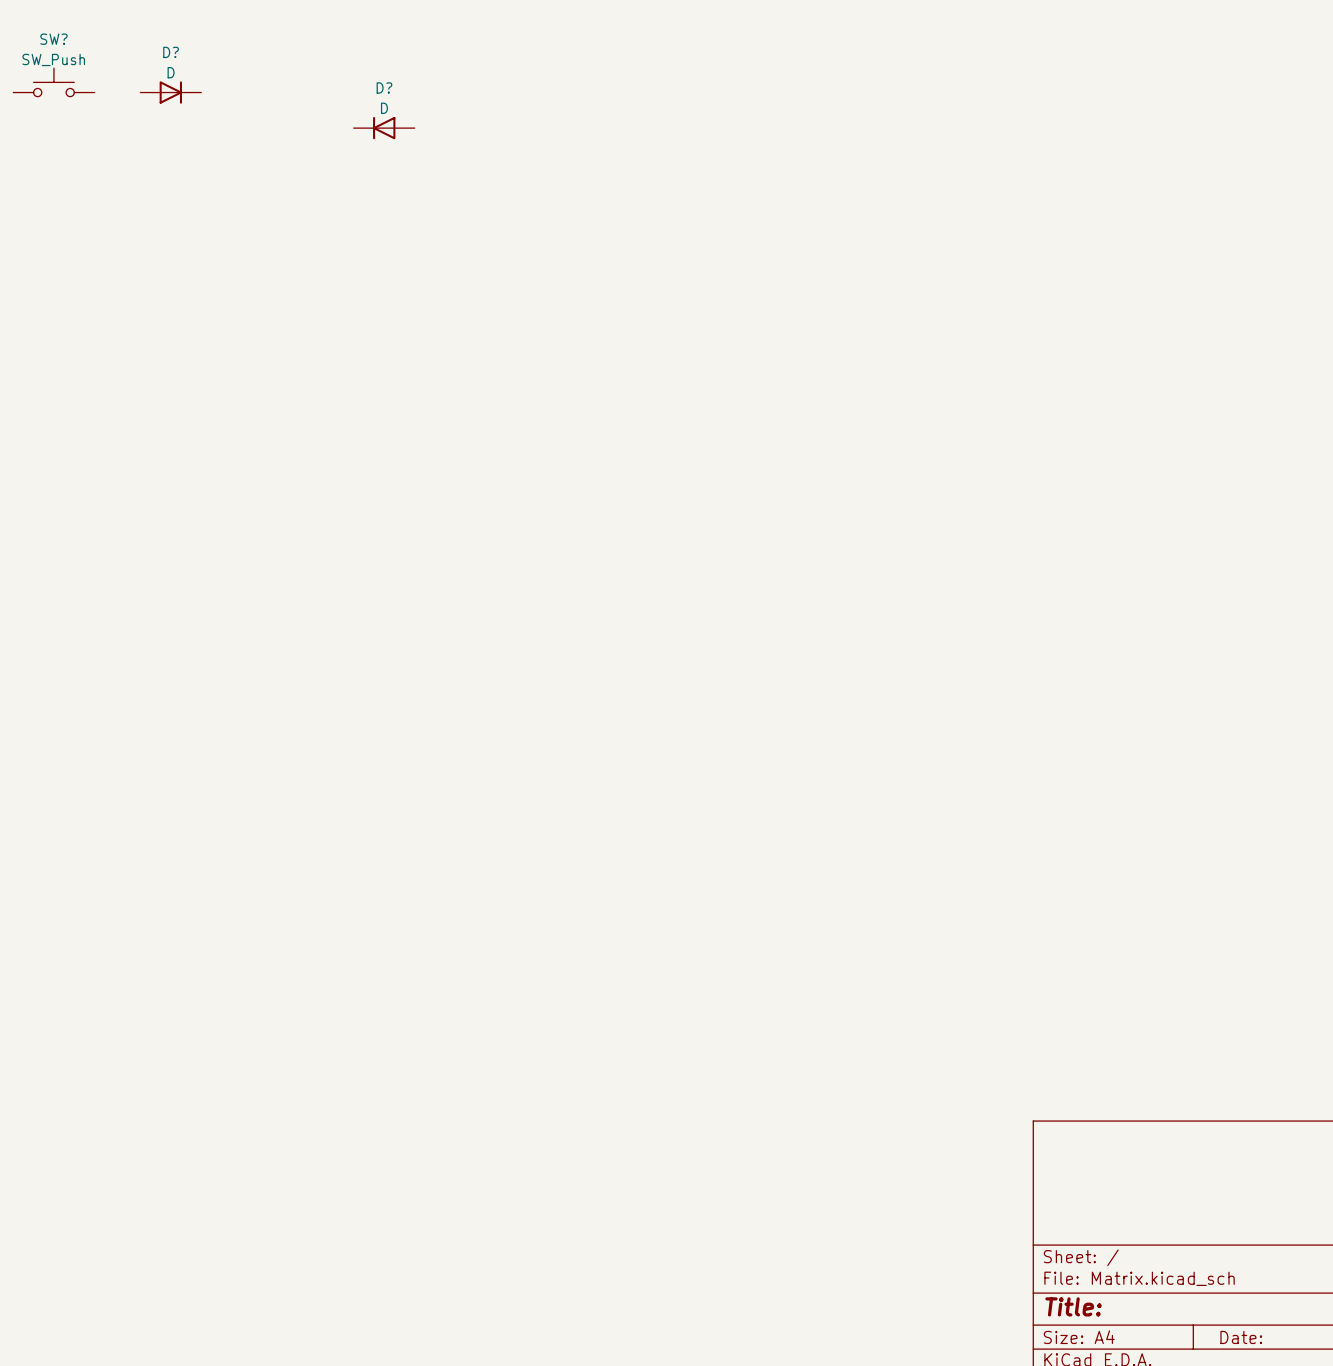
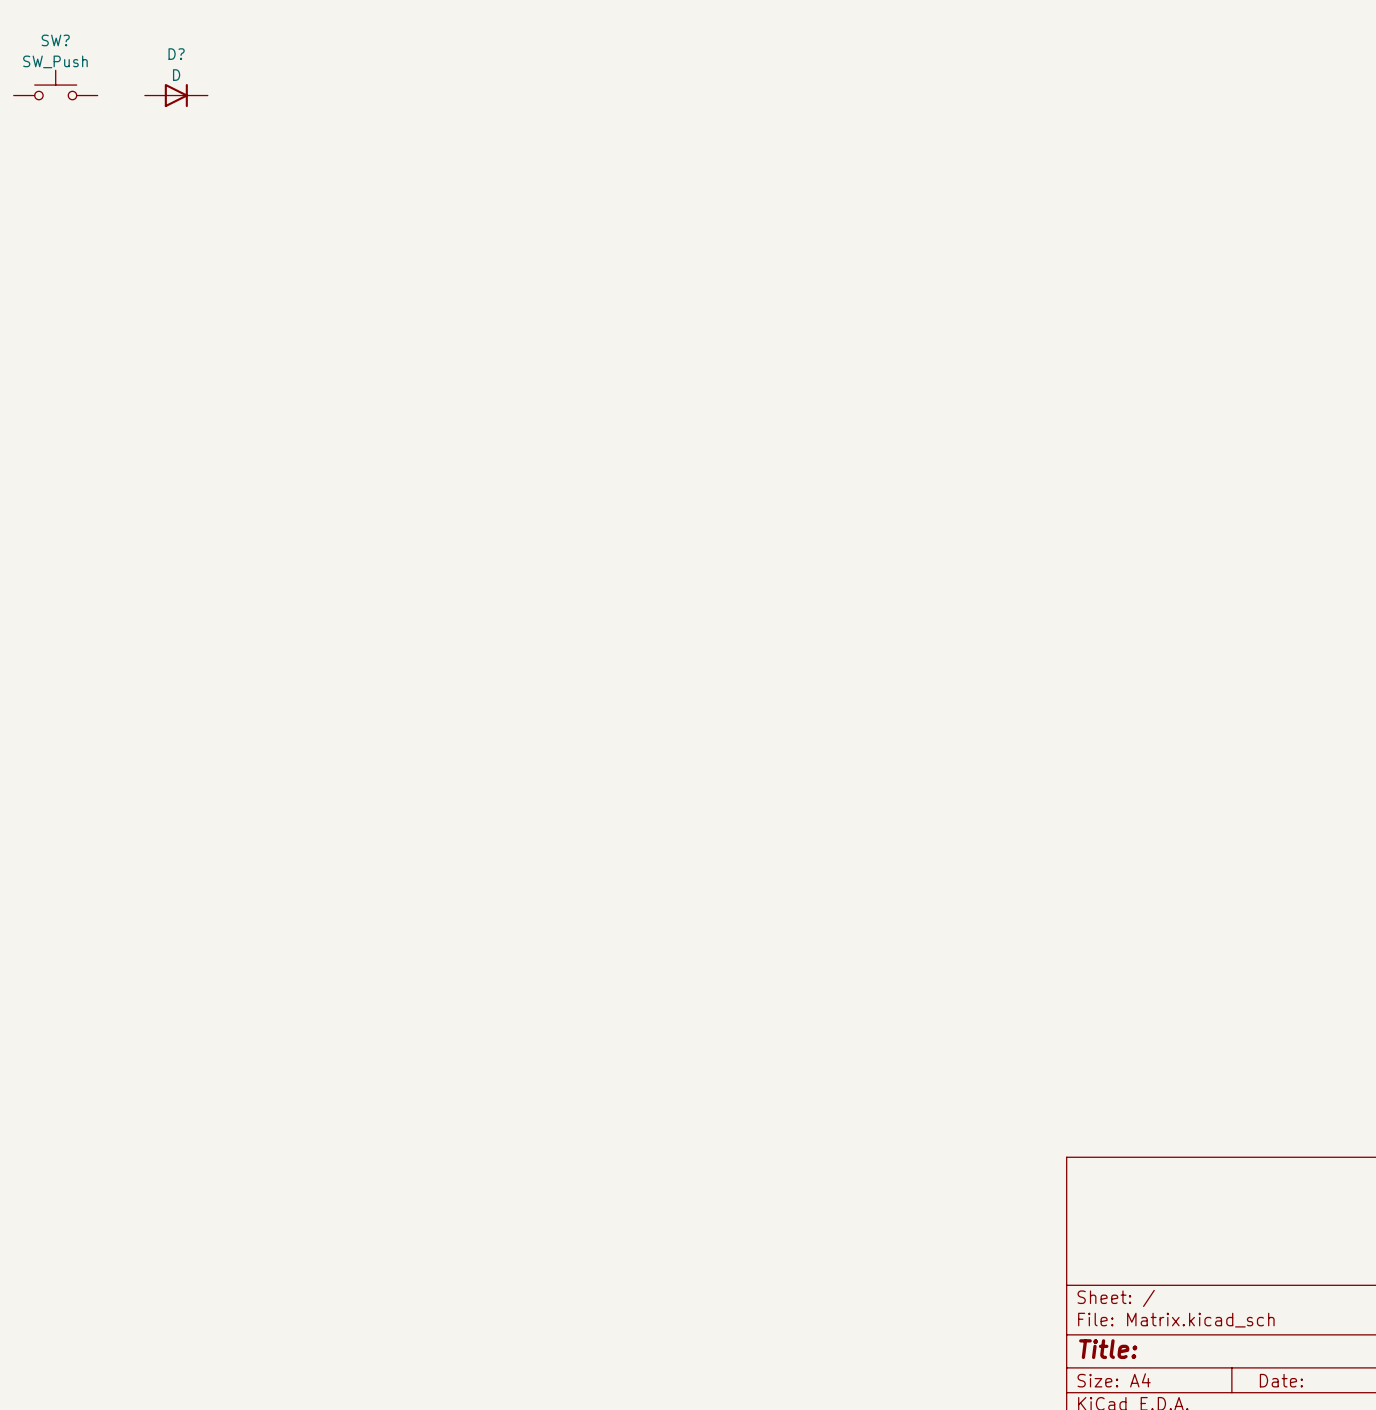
D?: D (384, 128) -> none

